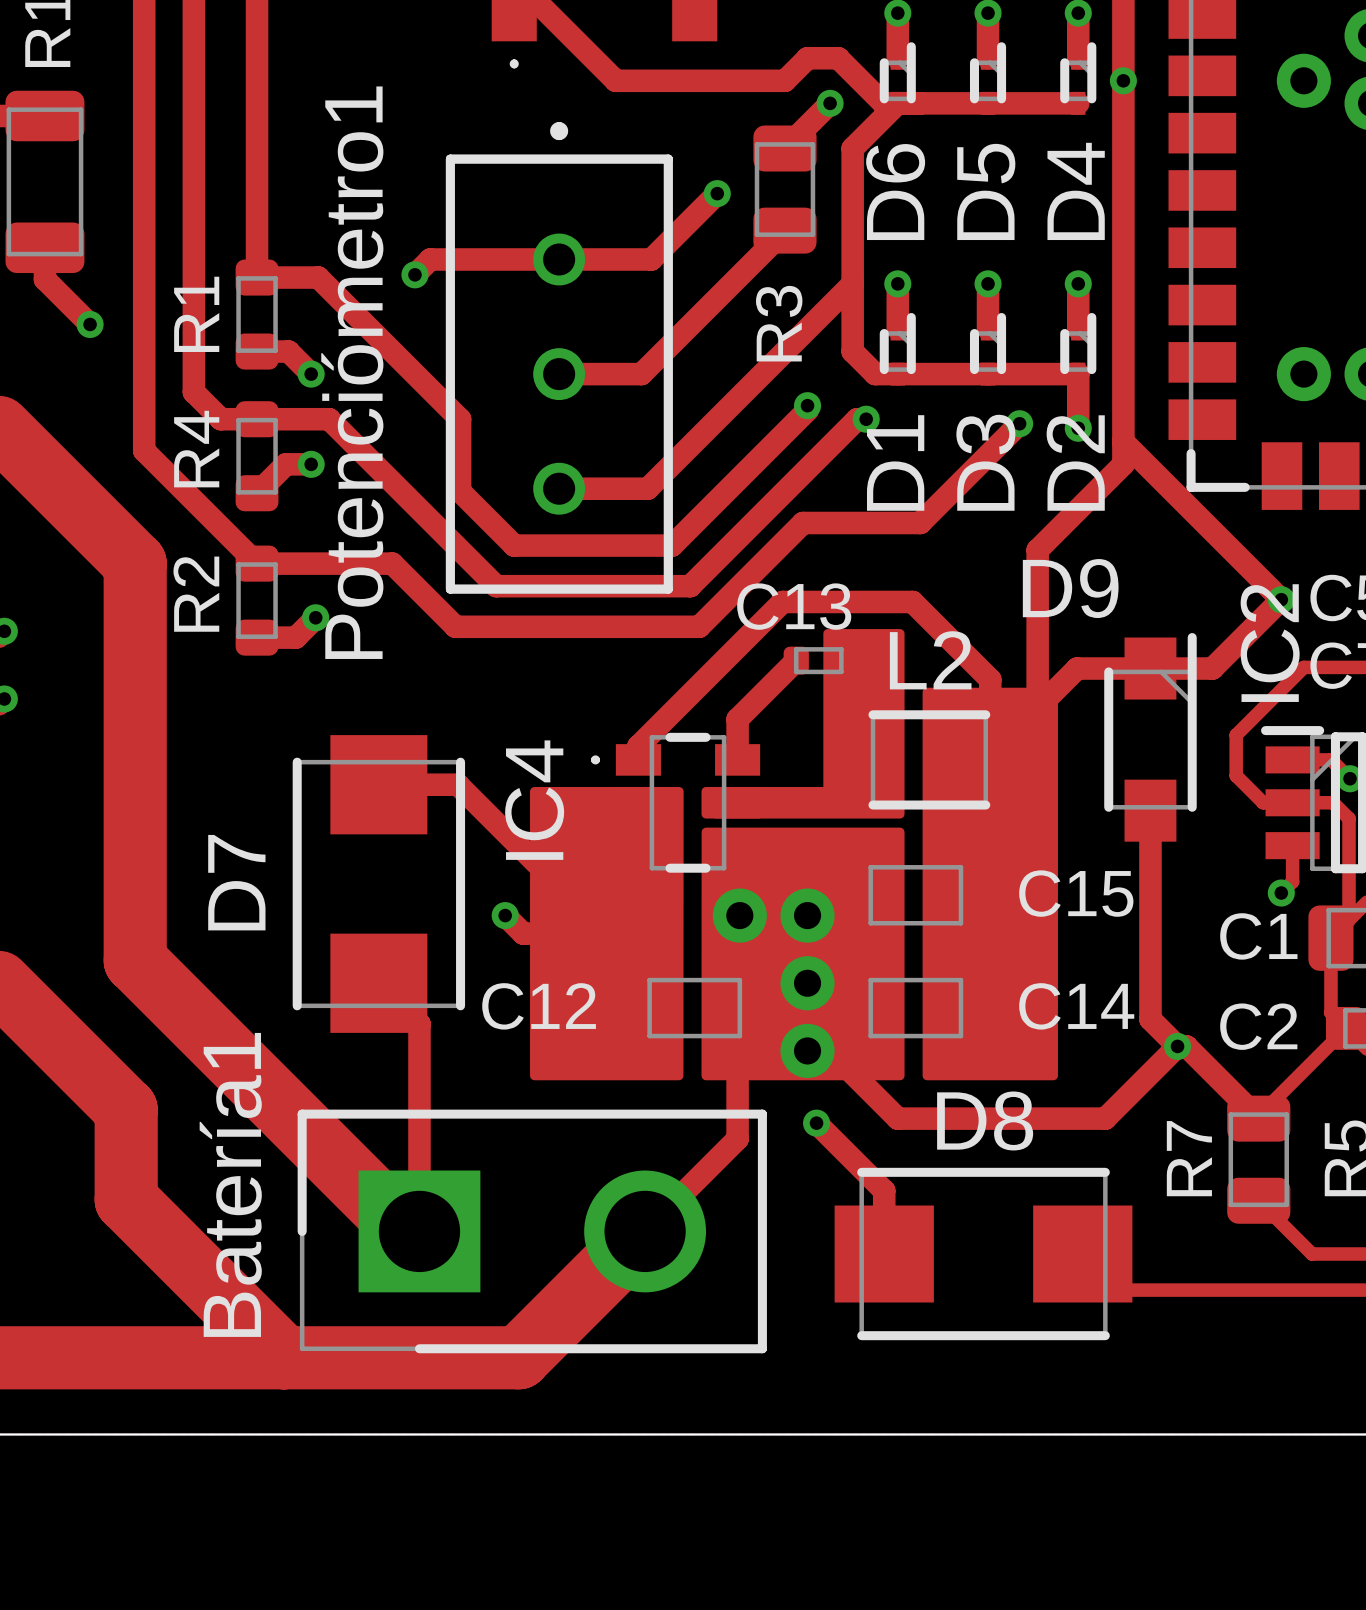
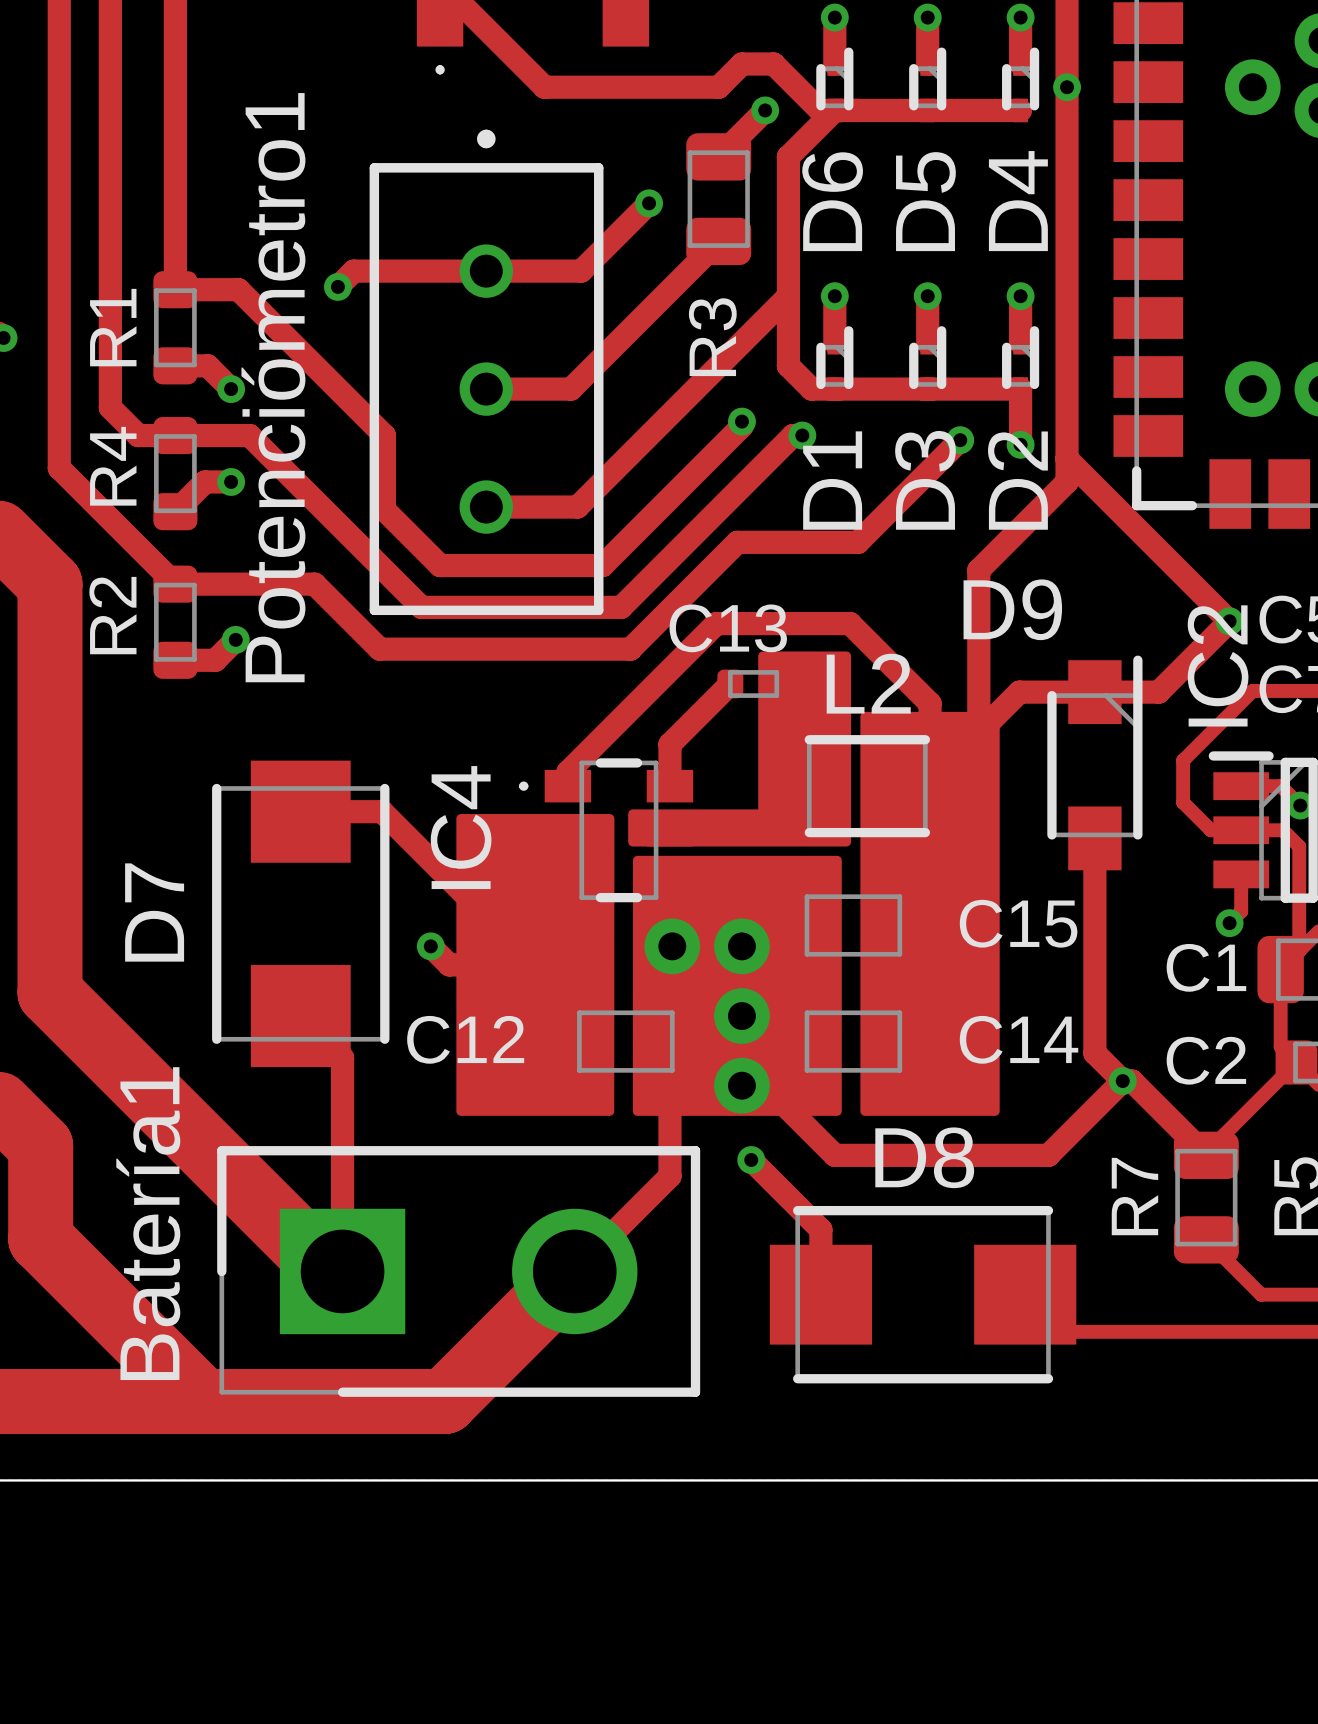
drawing shape: [701, 629, 905, 819] -> [628, 651, 852, 847]

